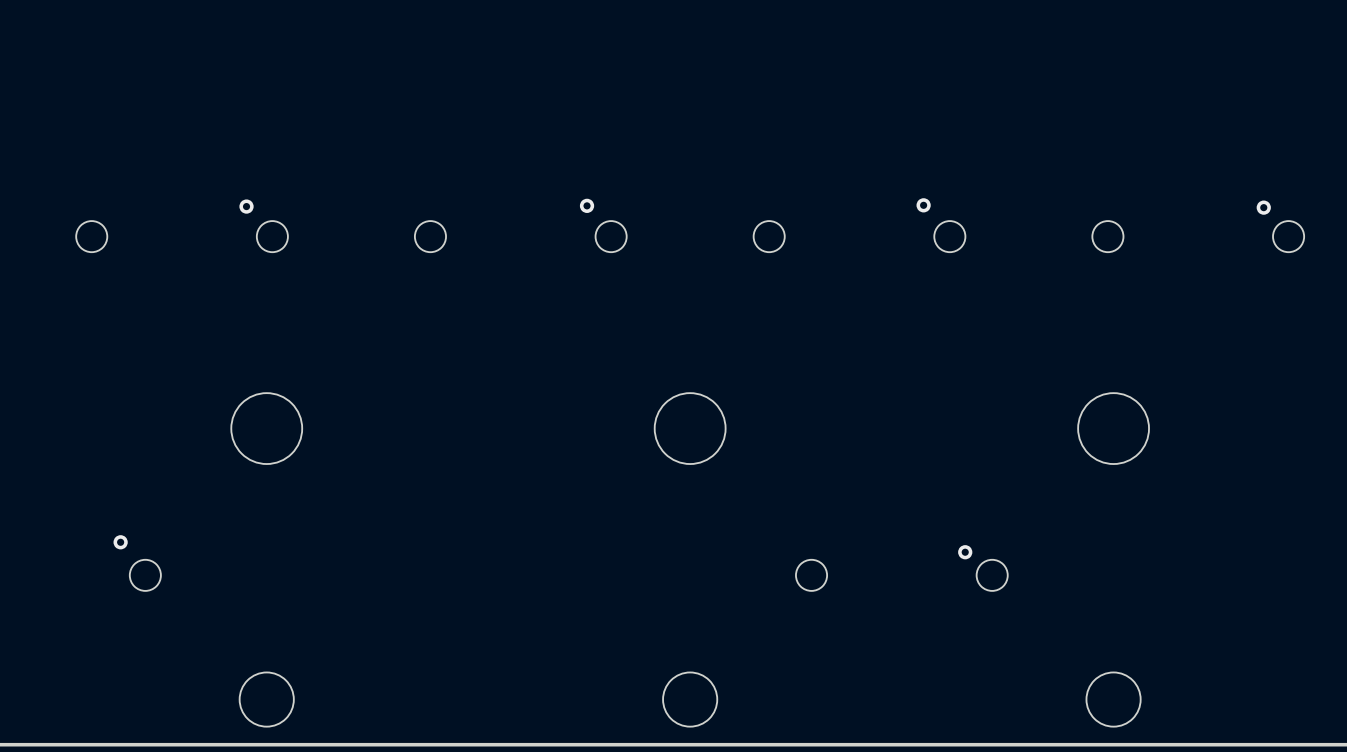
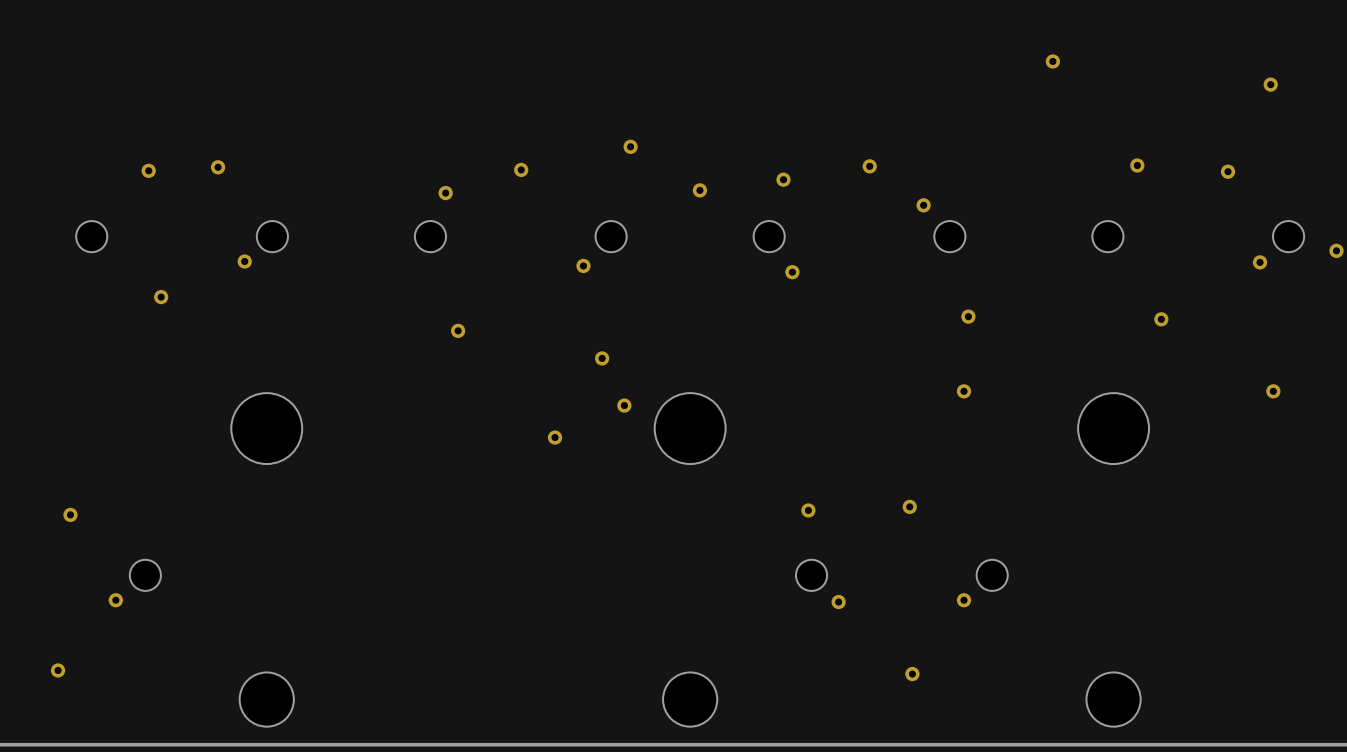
via: none -> (1052, 61)
via: none -> (1270, 84)
via: none -> (630, 146)
via: none -> (1137, 165)
via: none -> (869, 166)
via: none -> (218, 167)
via: none -> (521, 169)
via: none -> (148, 170)
via: none -> (1228, 171)
via: none -> (783, 179)
via: none -> (699, 190)
via: none -> (445, 193)
via: (587, 205) -> none
via: (246, 206) -> none
via: (1263, 207) -> none
via: none -> (1336, 250)
via: none -> (244, 261)
via: none -> (1260, 262)
via: none -> (583, 265)
via: none -> (792, 272)
via: none -> (161, 297)
via: none -> (968, 316)
via: none -> (1161, 319)
via: none -> (458, 330)
via: none -> (602, 358)
via: none -> (963, 391)
via: none -> (1273, 391)
via: none -> (624, 405)
via: none -> (555, 437)
via: none -> (909, 506)
via: none -> (808, 510)
via: none -> (70, 514)
via: (120, 542) -> none
via: (965, 552) -> none
via: none -> (115, 600)
via: none -> (963, 600)
via: none -> (838, 602)
via: none -> (58, 670)
via: none -> (912, 674)

